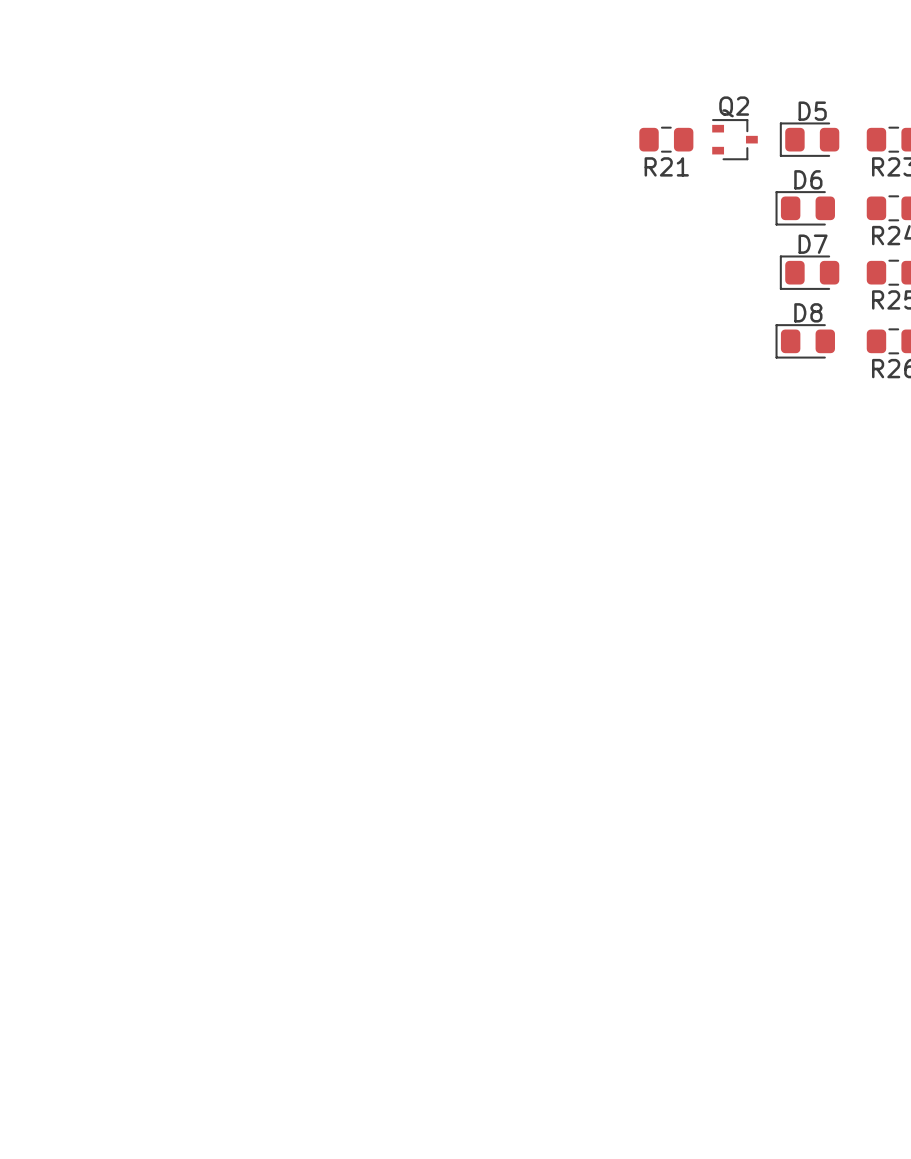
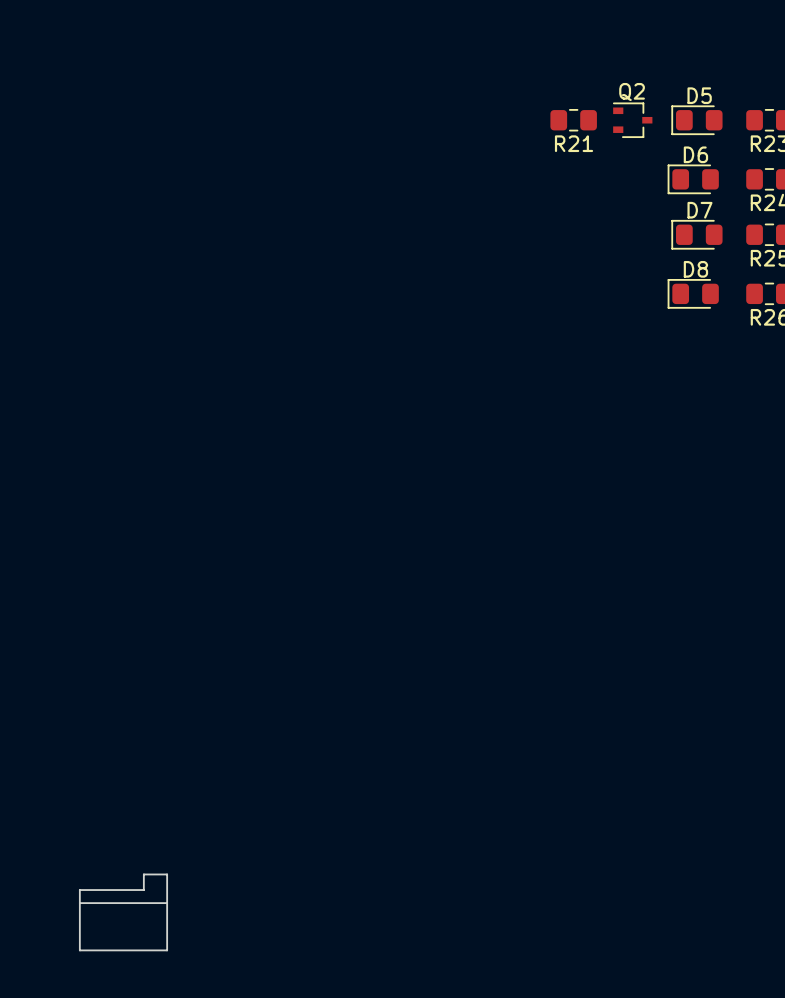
board edge: none -> (143, 874) (167, 874) (167, 950) (79, 950) (79, 890) (143, 890) (143, 874)
board edge: none -> (79, 903) (167, 903)

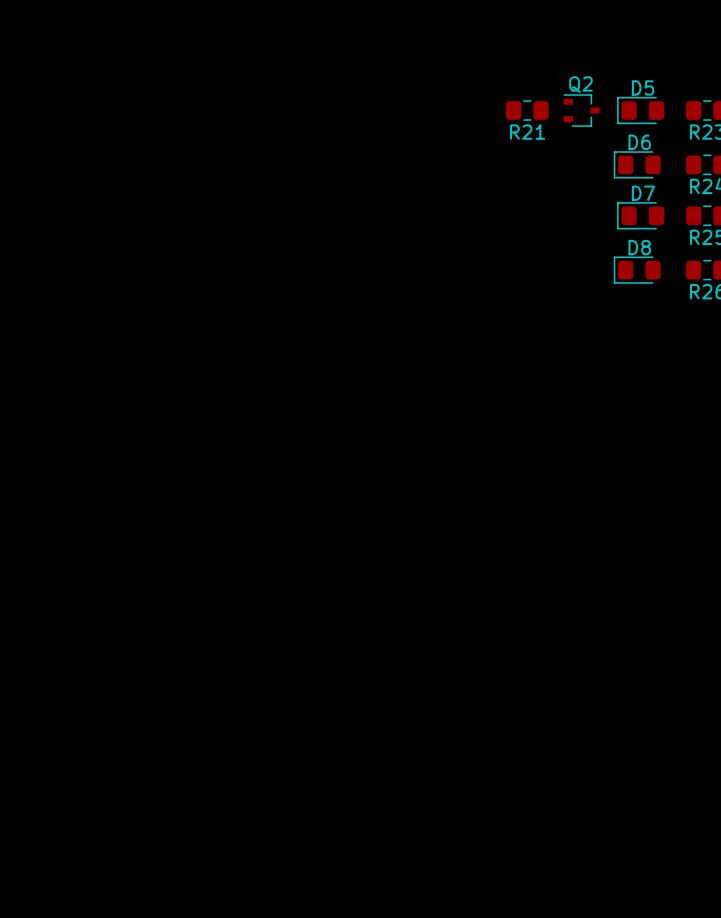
board edge: (143, 874) (167, 874) (167, 950) (79, 950) (79, 890) (143, 890) (143, 874) -> none
board edge: (79, 903) (167, 903) -> none

